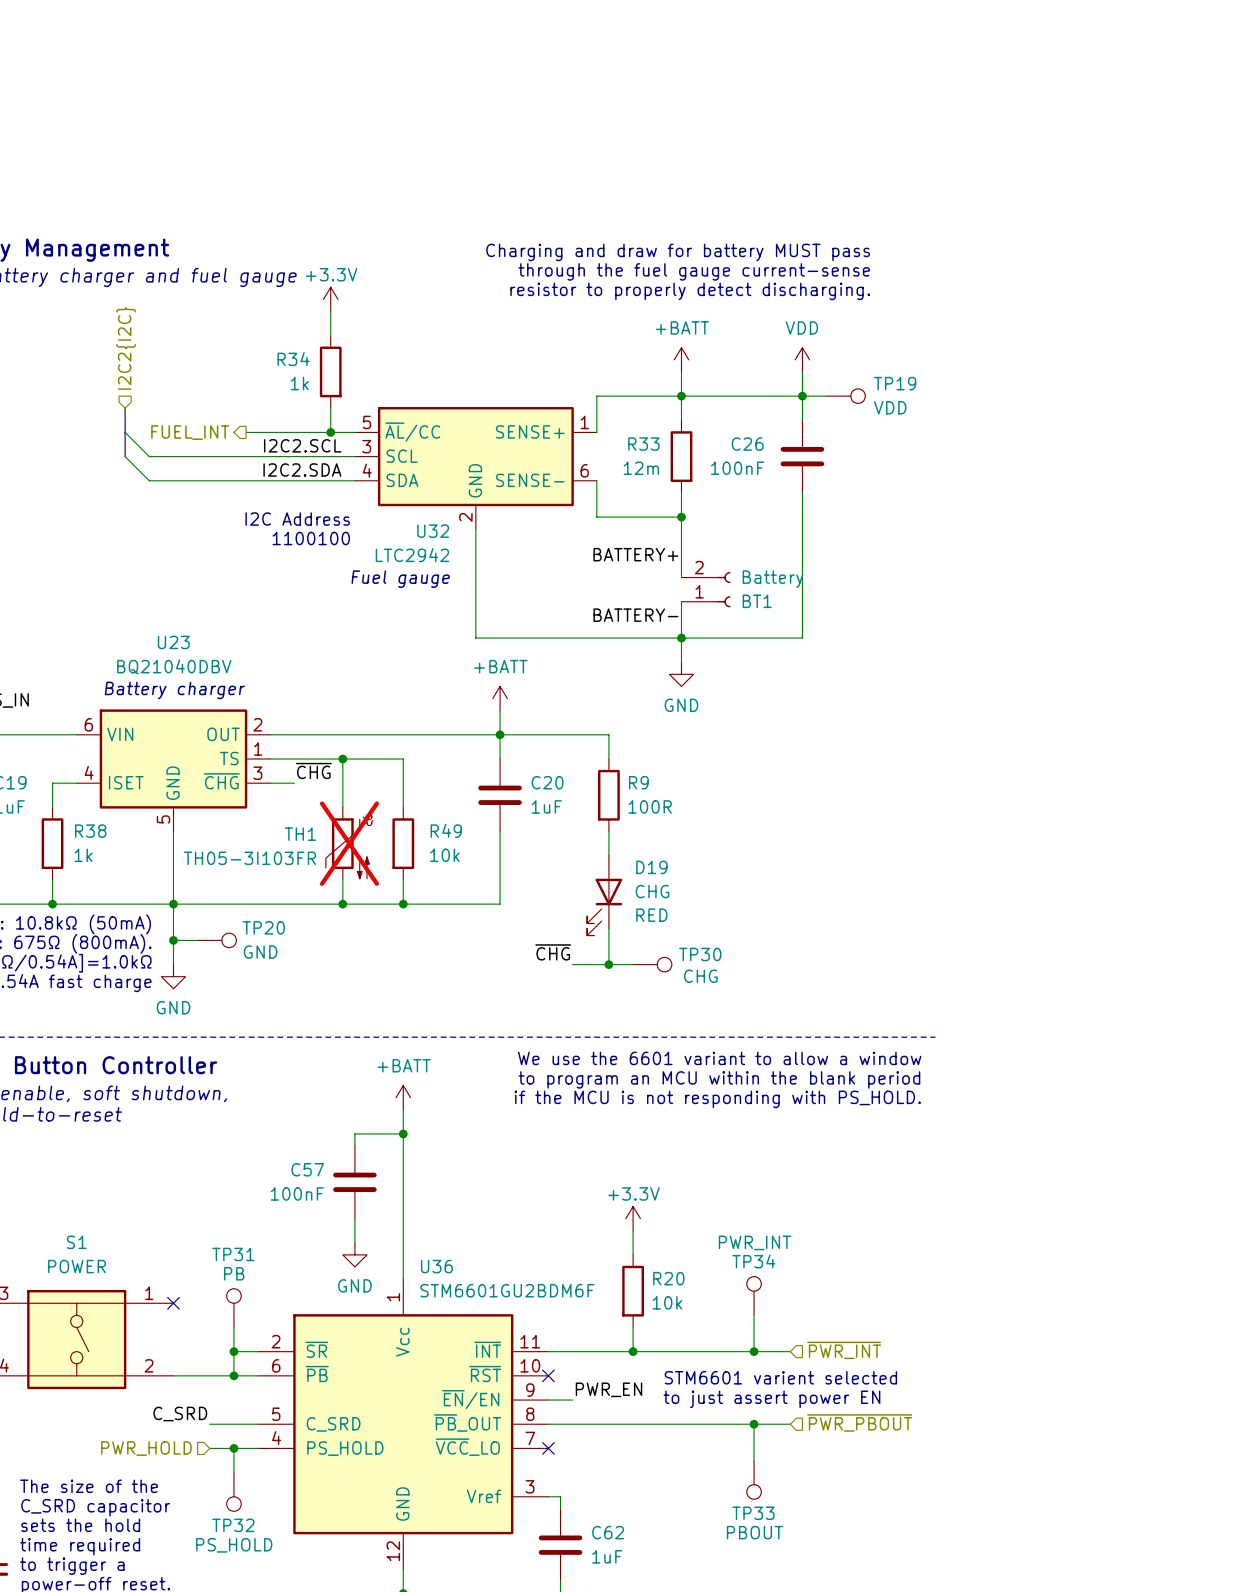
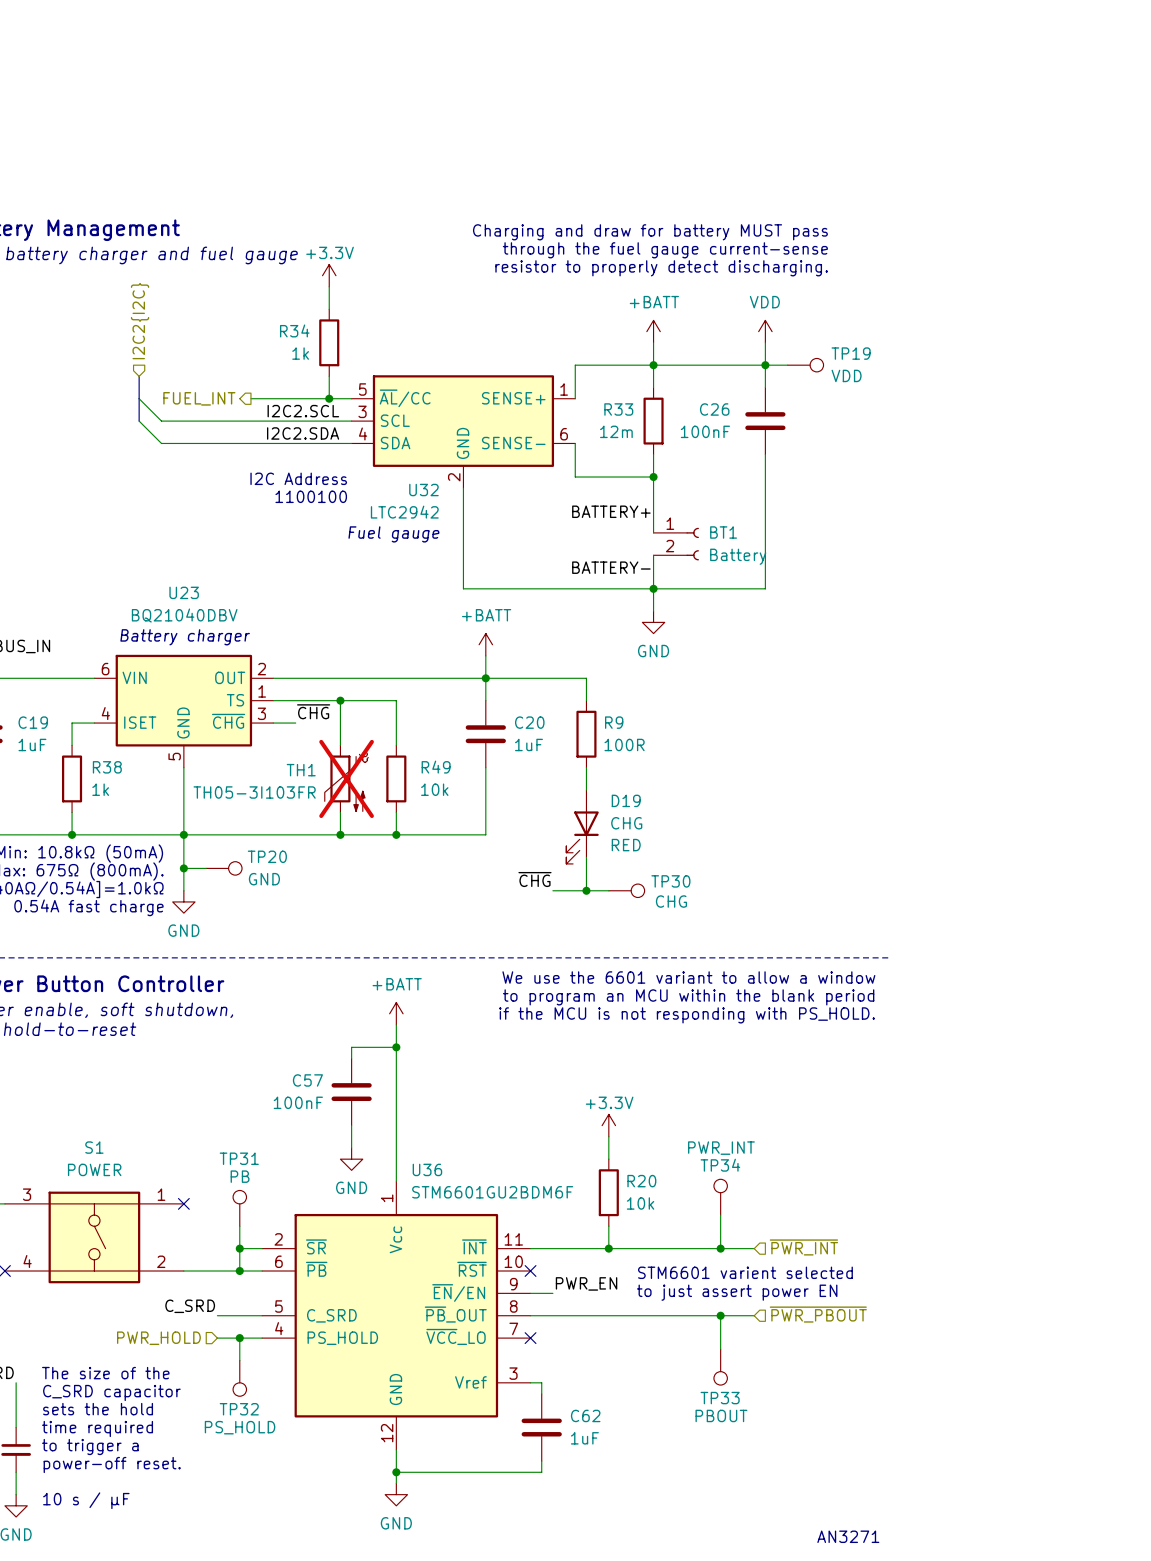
BT1 flip: as is (723, 589) -> up-down (692, 544)

